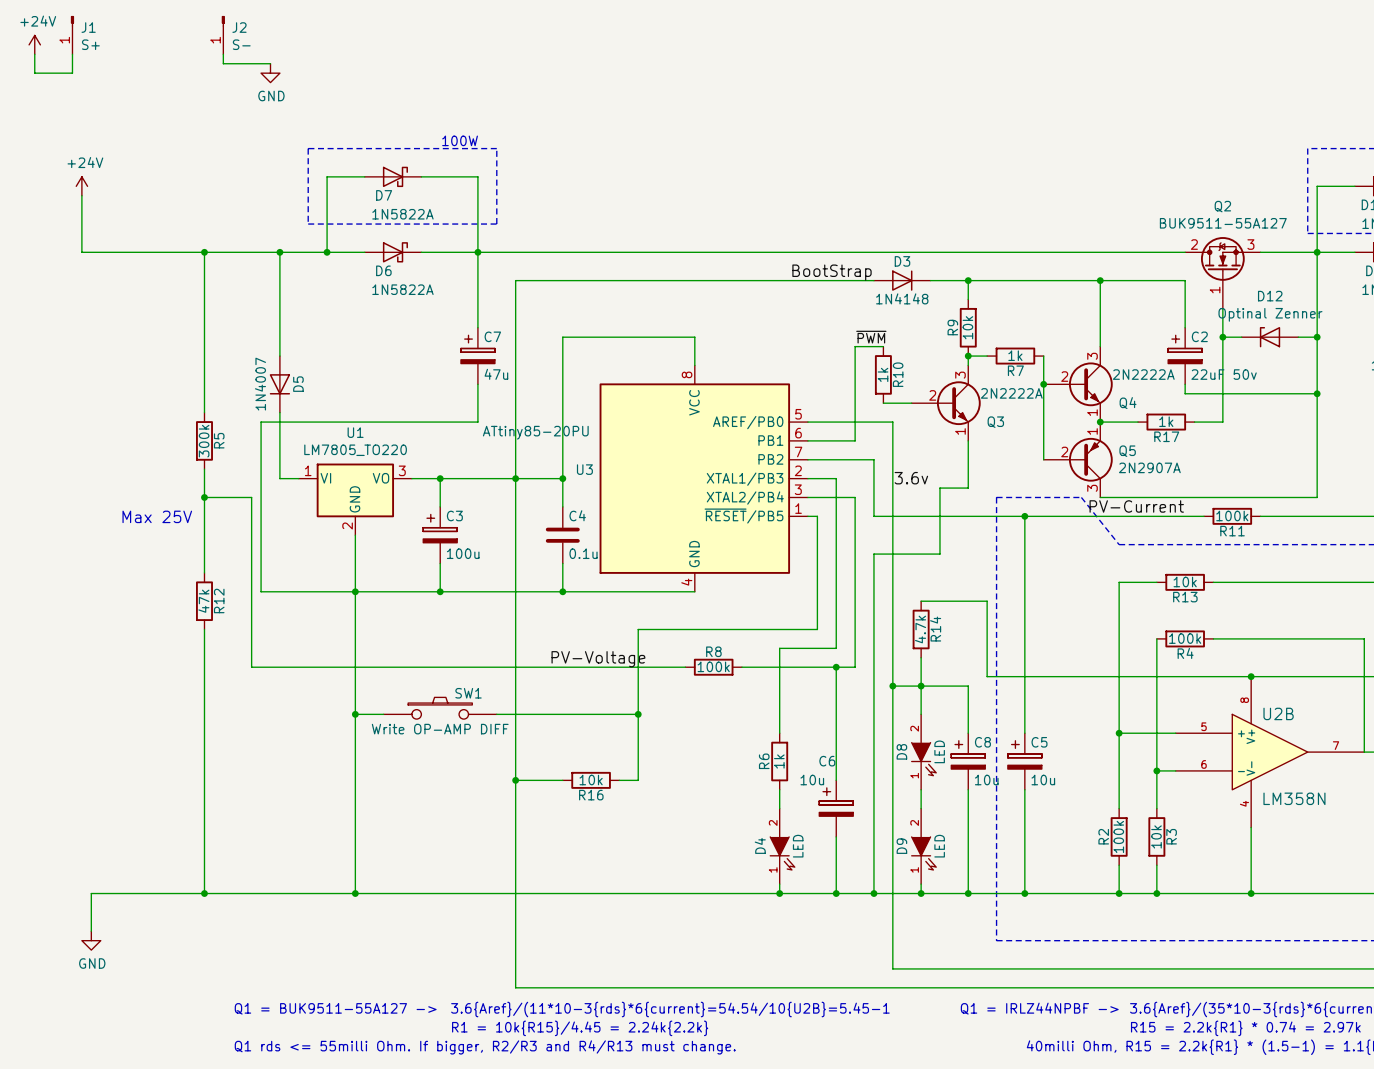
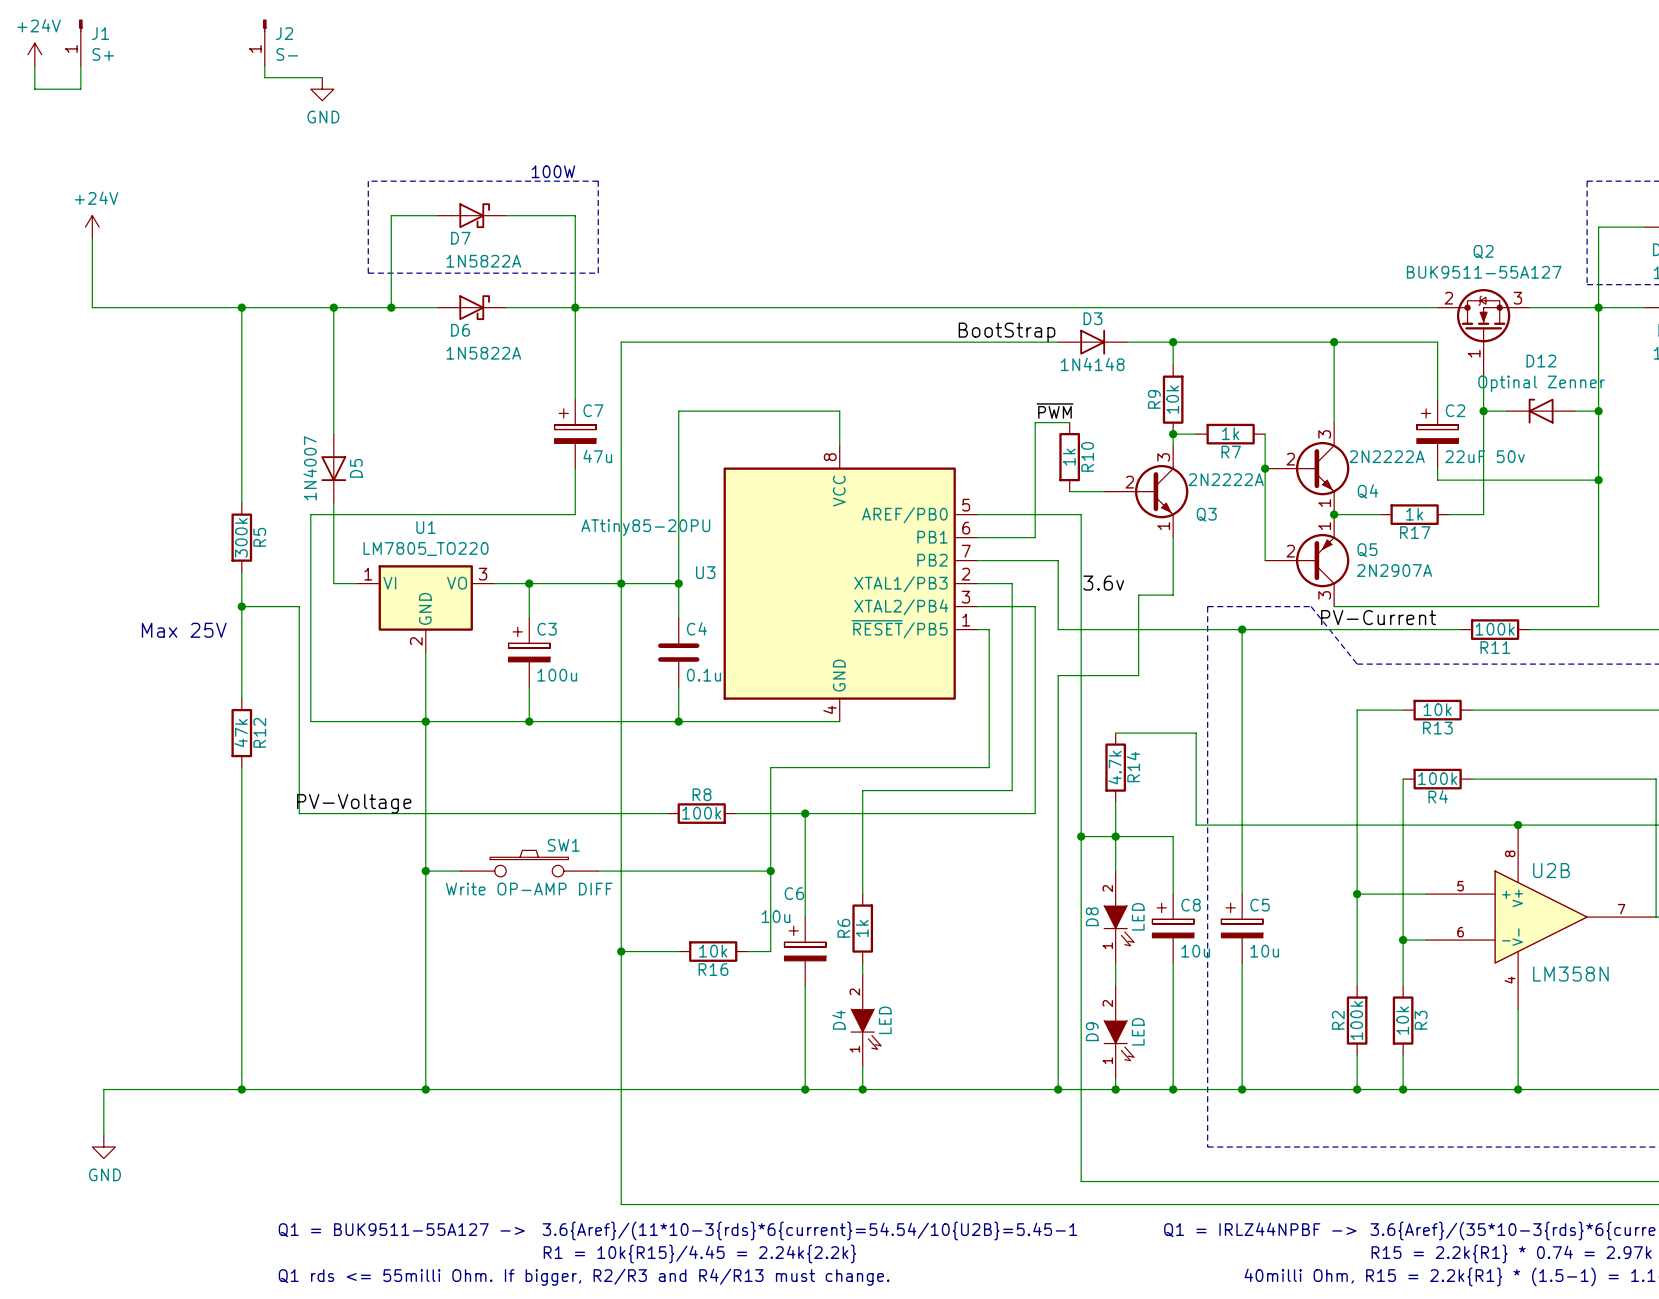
wire: (779, 648) (779, 733) -> (943, 790) (862, 790) (862, 894)
label: none -> PV-Voltage (354, 803)
label: PV-Voltage (598, 659) -> none
wire: none -> (805, 813) (805, 917)
junction: none -> (805, 813)
R8 position: (713, 667) -> (701, 813)
wire: (836, 667) (836, 780) -> none
junction: (836, 667) -> none
R6 position: (779, 761) -> (862, 928)
wire: (779, 789) (779, 808) -> (862, 1066) (862, 1089)
wire: none -> (805, 986) (805, 1089)
C6 position: (836, 808) -> (805, 951)
wire: (836, 836) (836, 893) -> none
D4 position: (782, 846) -> (866, 1020)
wire: (779, 884) (779, 893) -> (862, 963) (862, 974)
junction: none -> (805, 1089)
junction: none -> (862, 1089)
junction: (779, 893) -> none
junction: (836, 893) -> none

